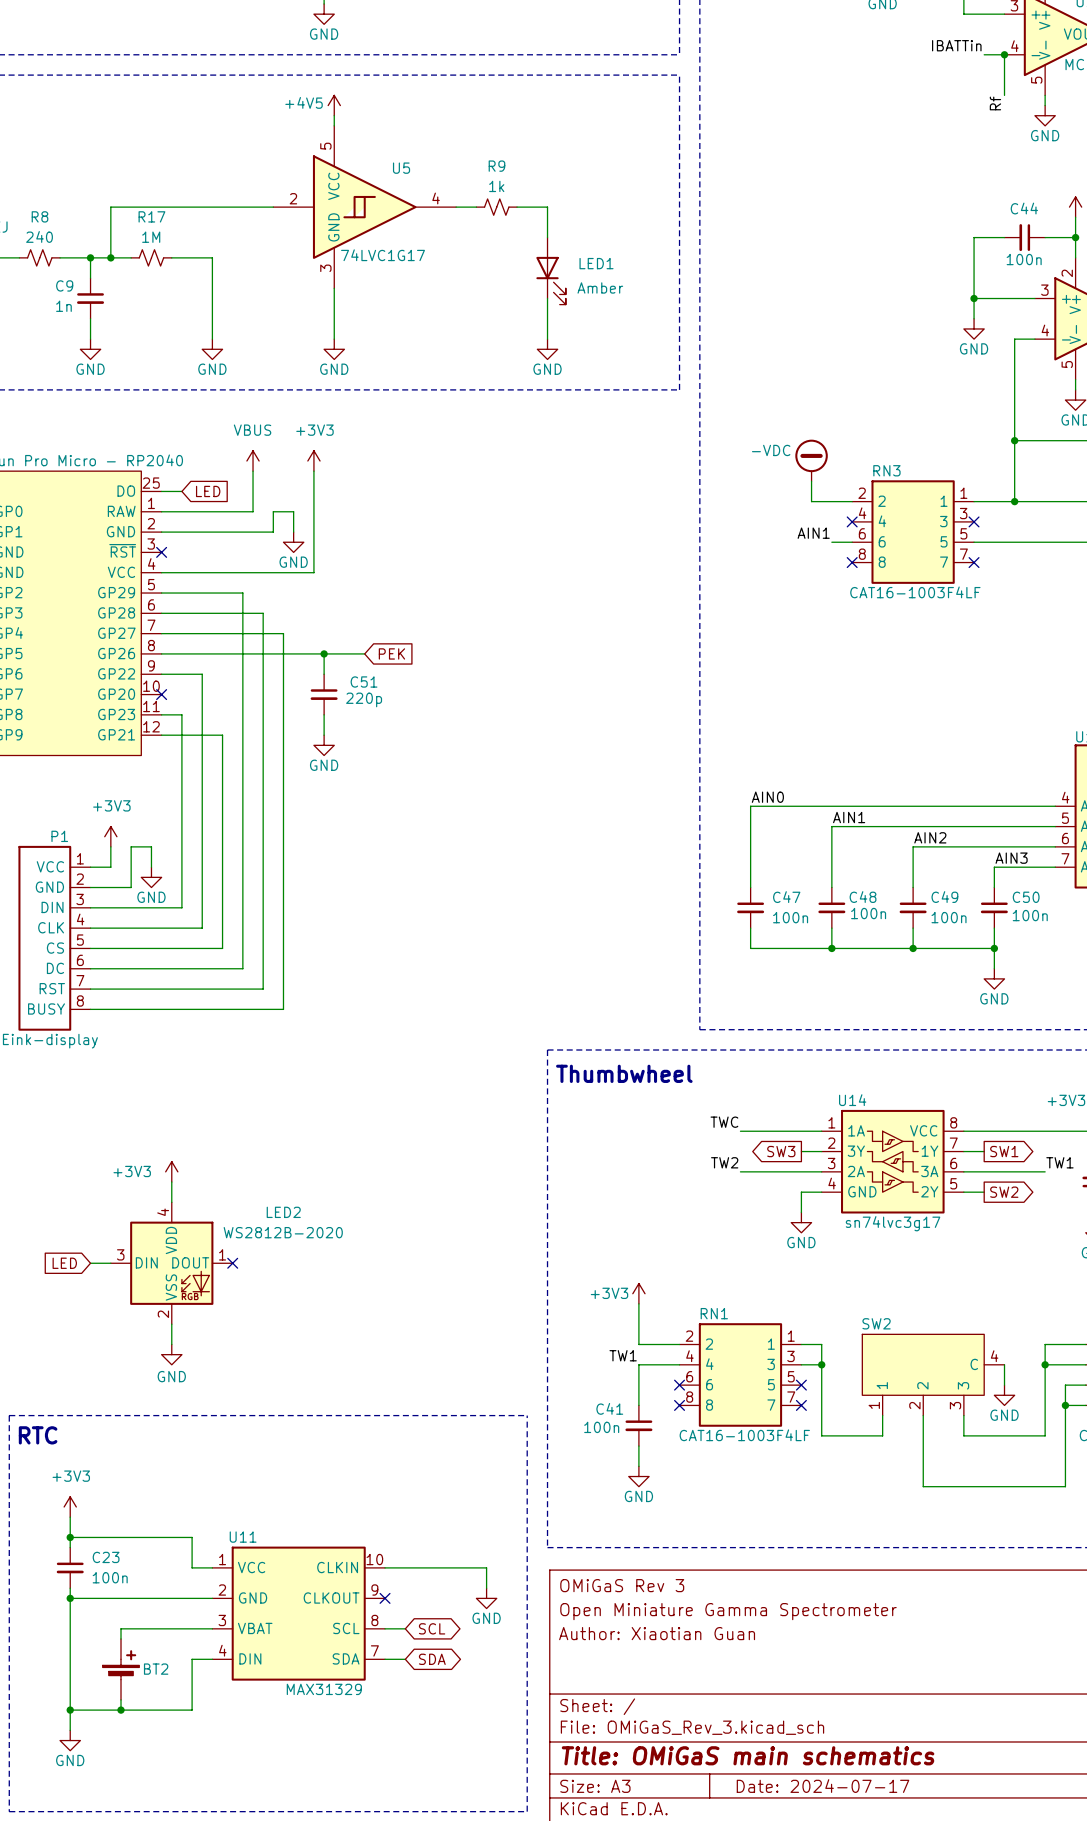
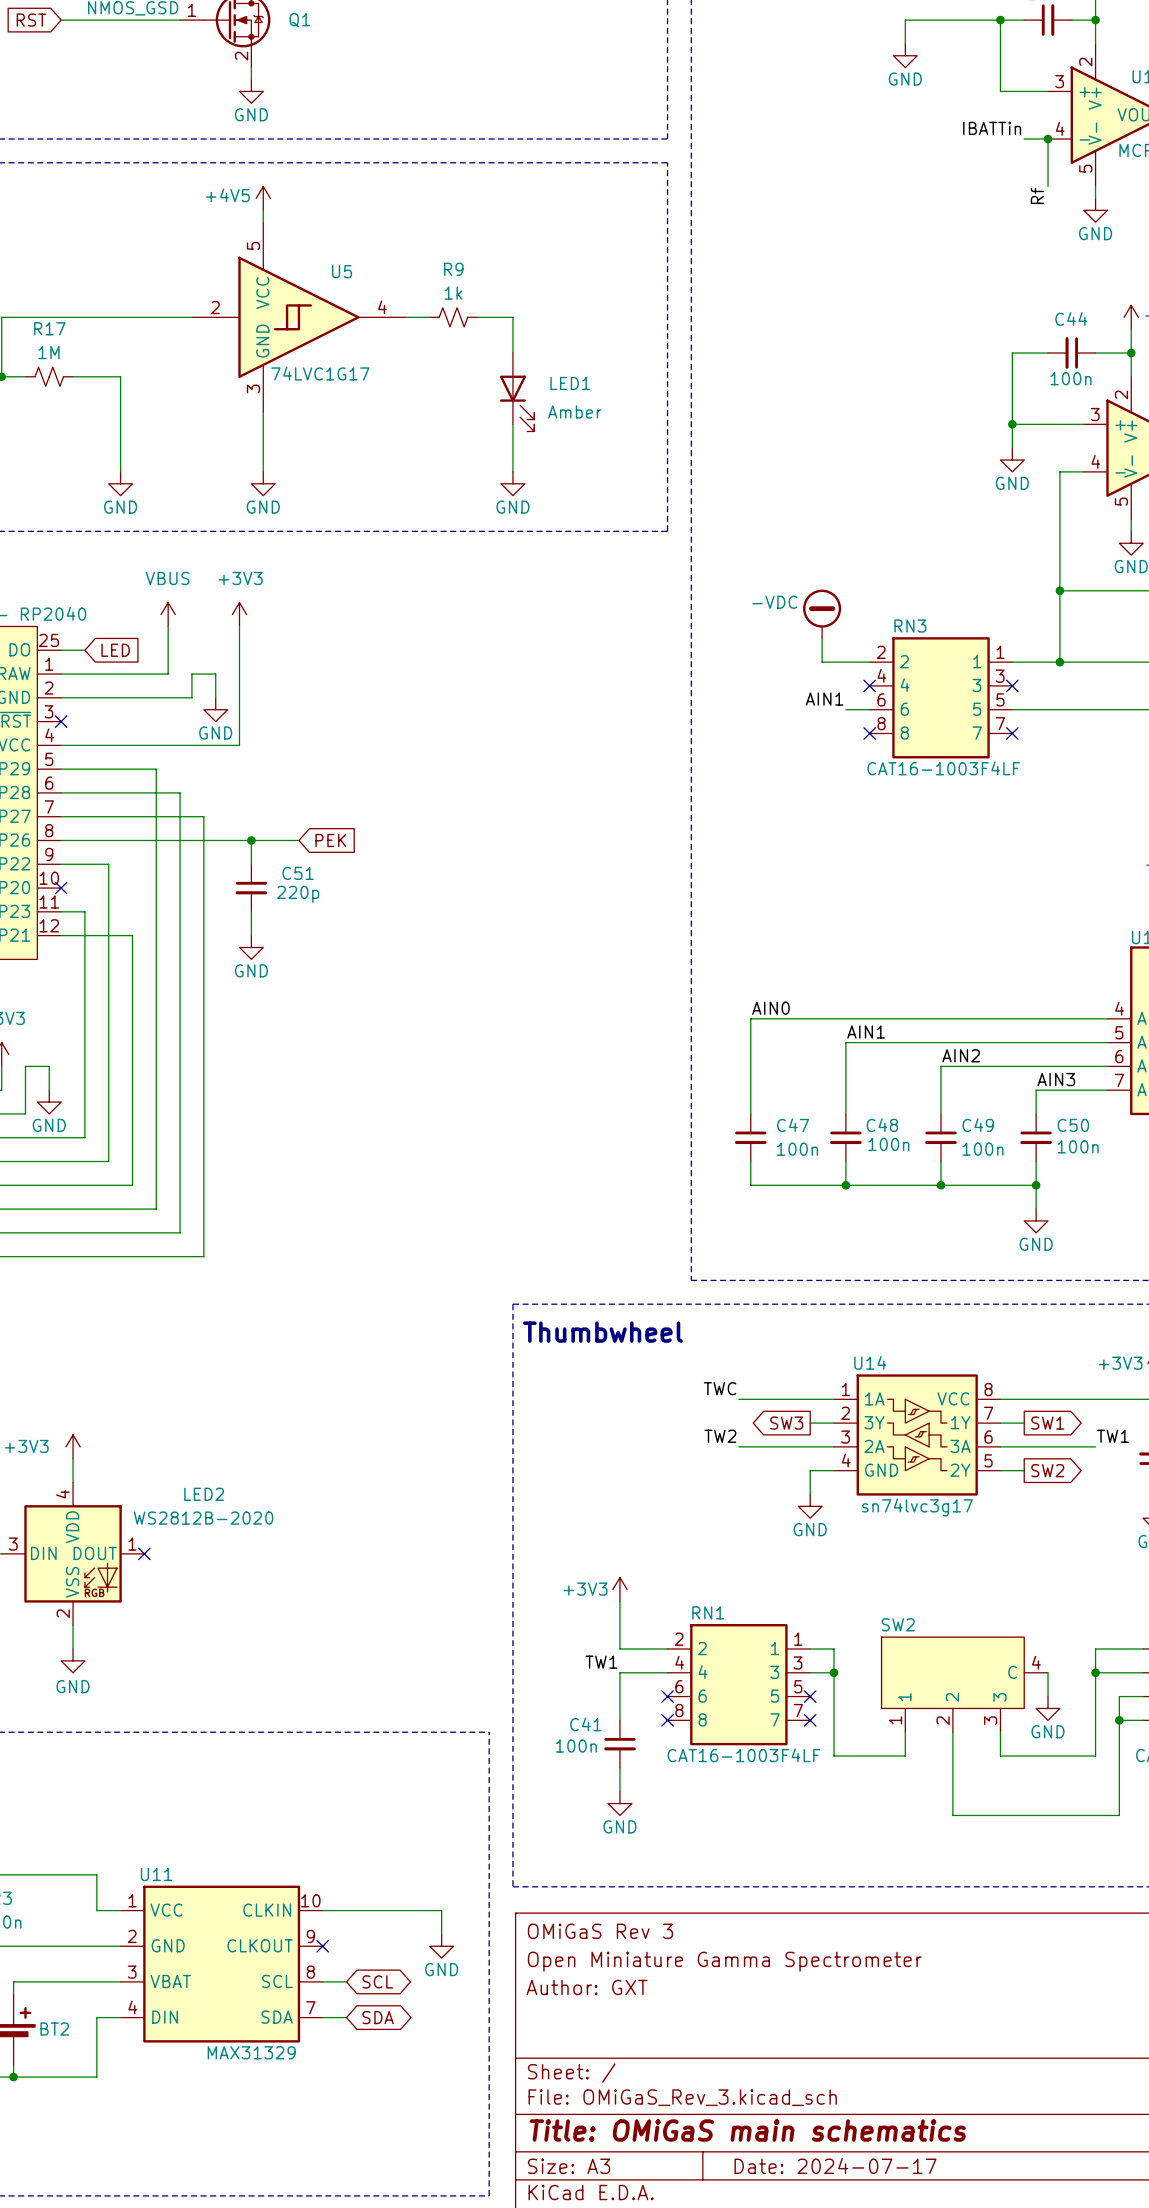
title block: Author: Xiaotian Guan (657, 1633) -> Author: GXT (587, 1987)

